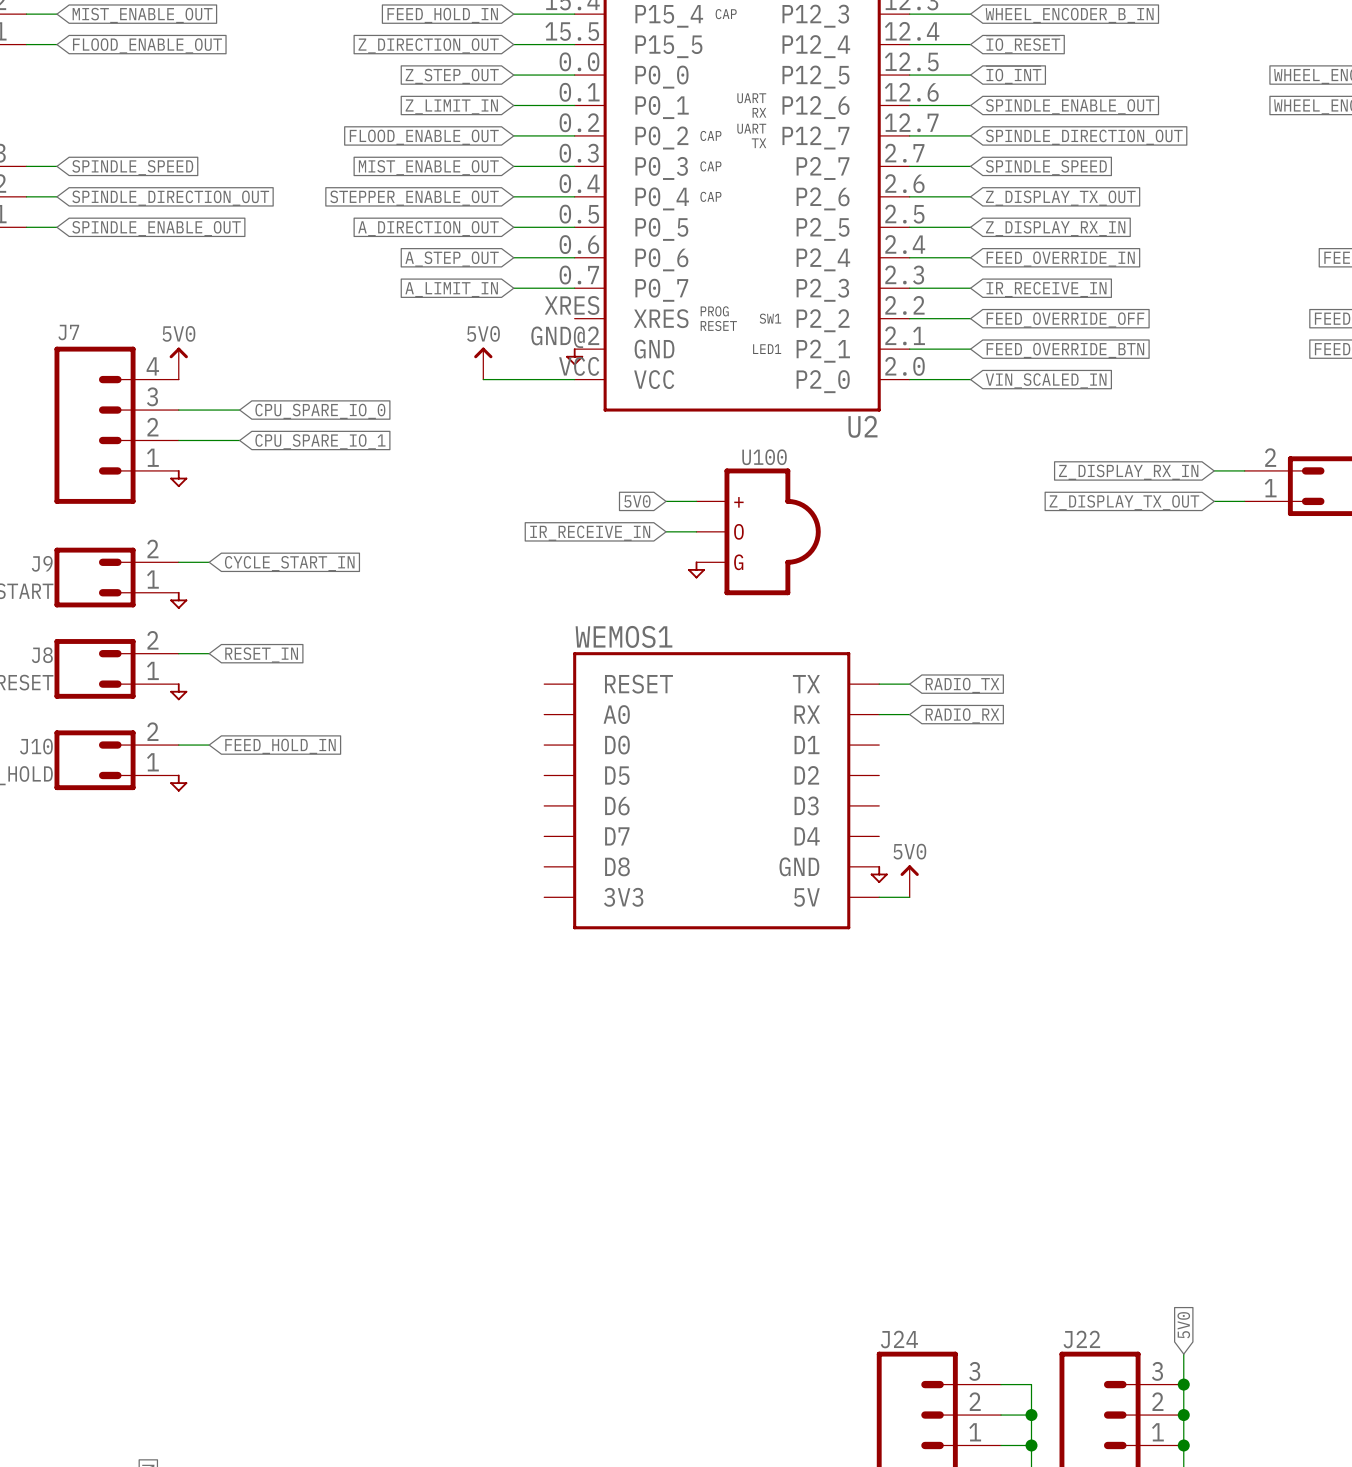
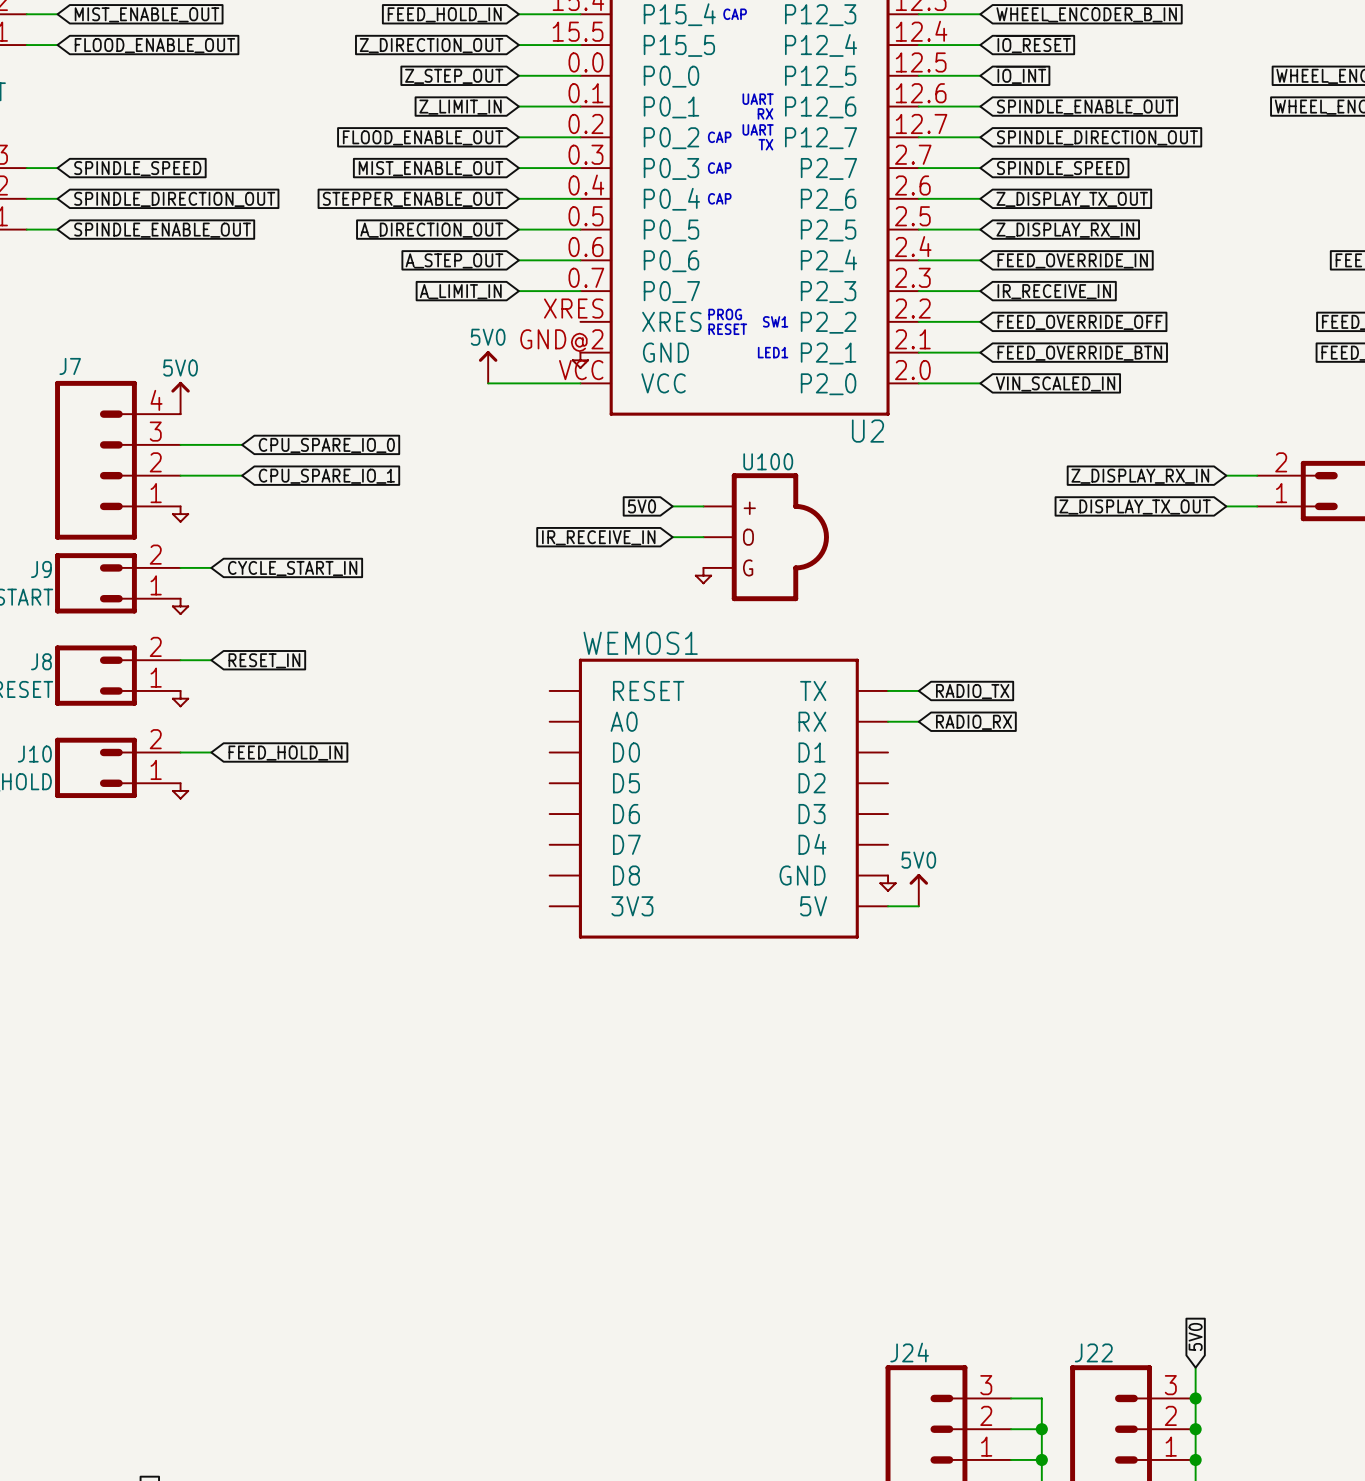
power symbol position: 5V0 (178, 363) -> 5V0 (180, 397)
wire: (178, 410) (239, 410) -> (180, 475) (242, 475)
global label: CPU_SPARE_IO_0 (320, 411) -> none
J7 position: (116, 425) -> (117, 460)
global label: CPU_SPARE_IO_1 (320, 441) -> CPU_SPARE_IO_0 (326, 445)
global label: none -> CPU_SPARE_IO_1 (326, 476)
power symbol position: (178, 478) -> (180, 514)

